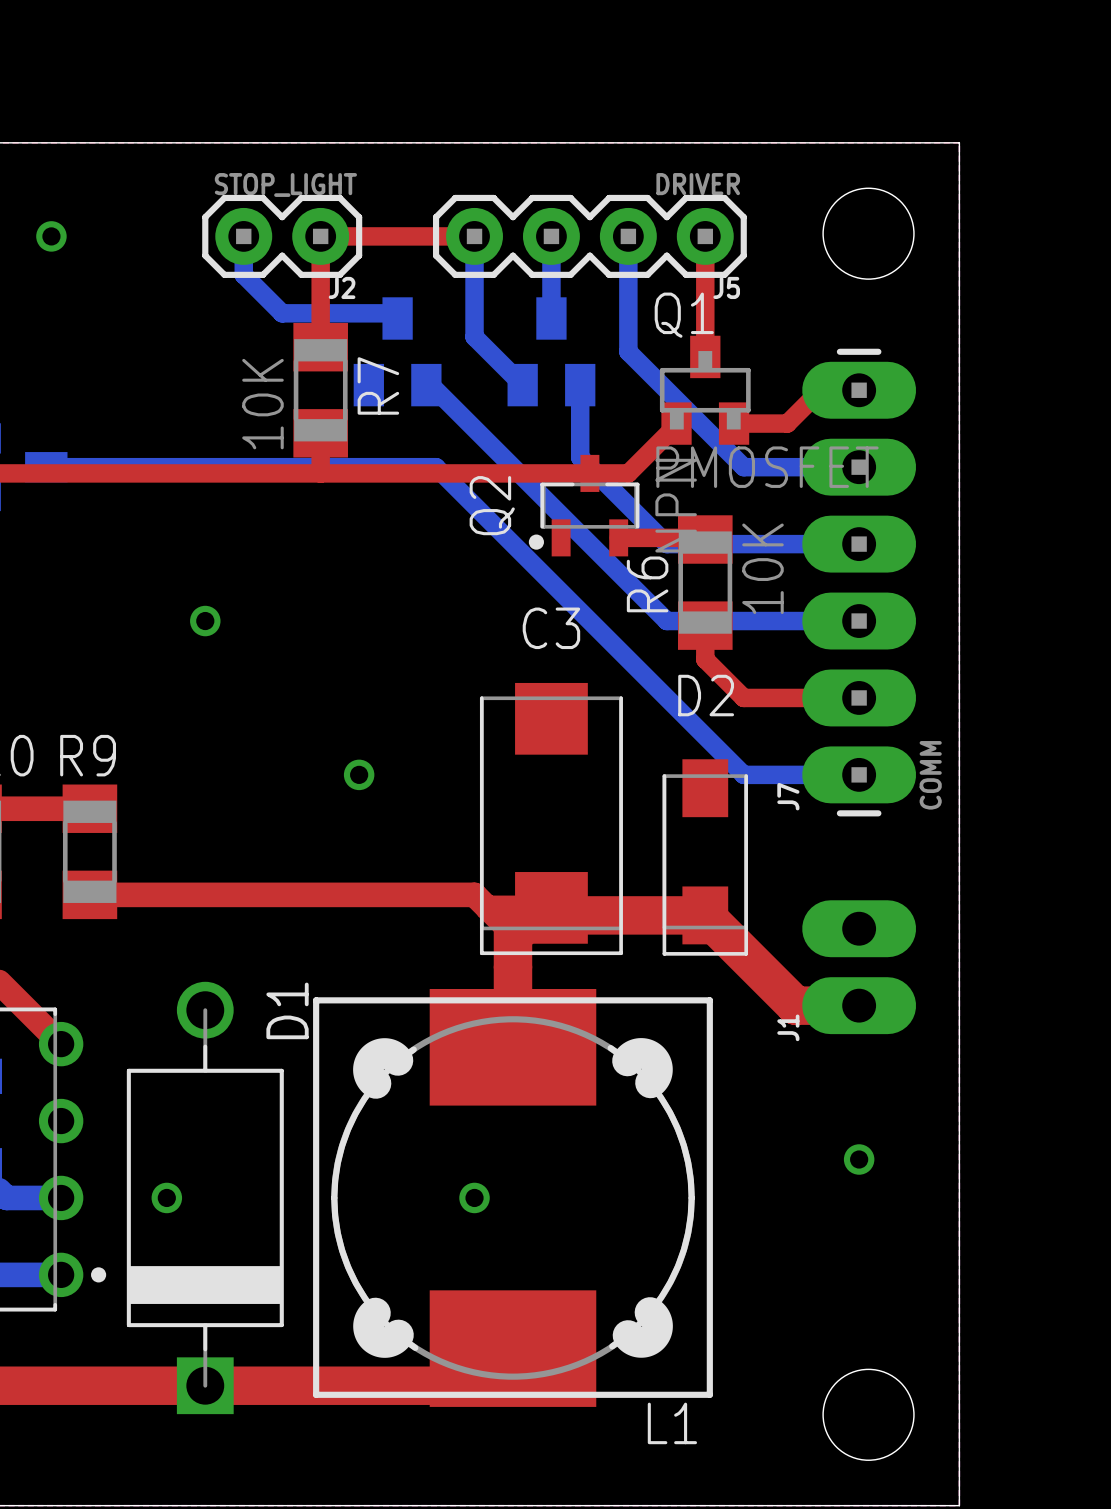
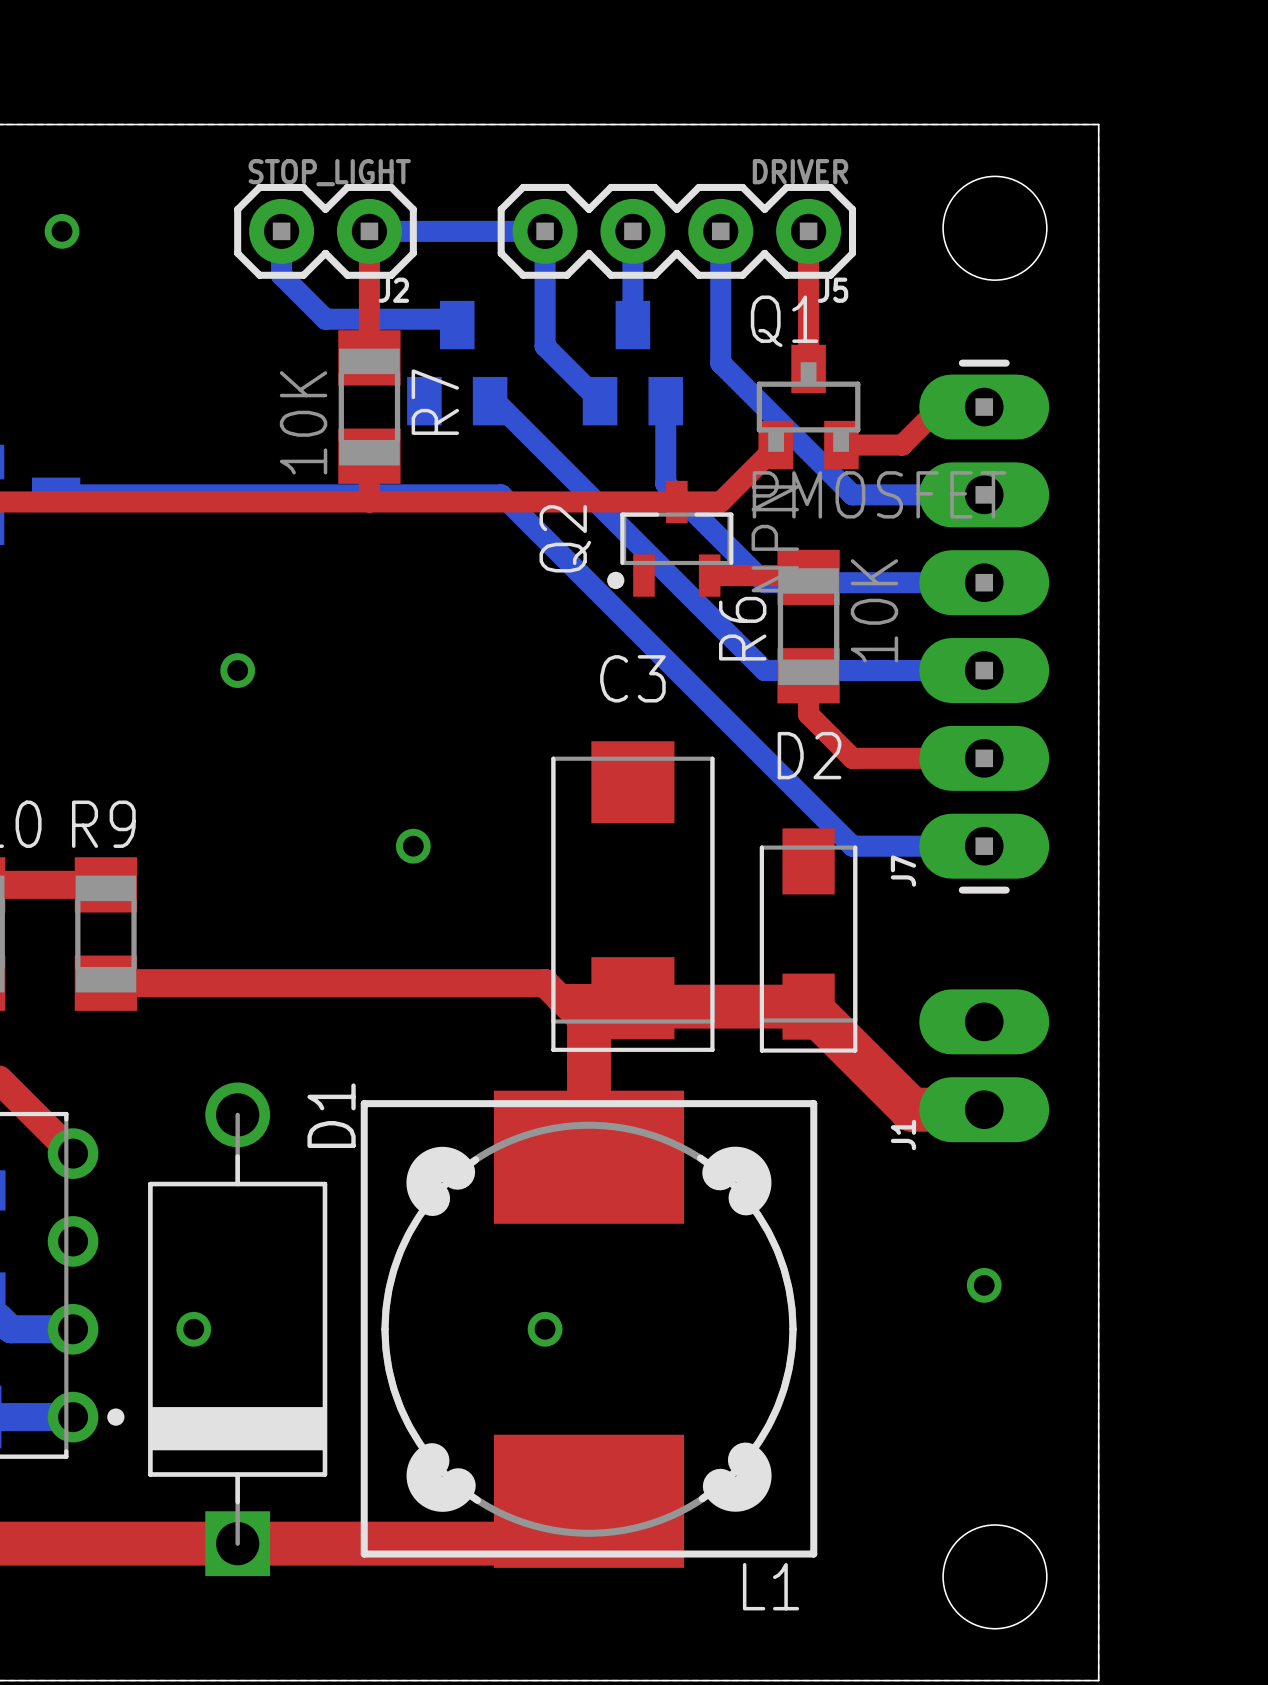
bottom track: none -> (369, 231) (545, 231)
top track: (320, 236) (474, 236) -> none
J7 value: COMM (930, 775) -> none

